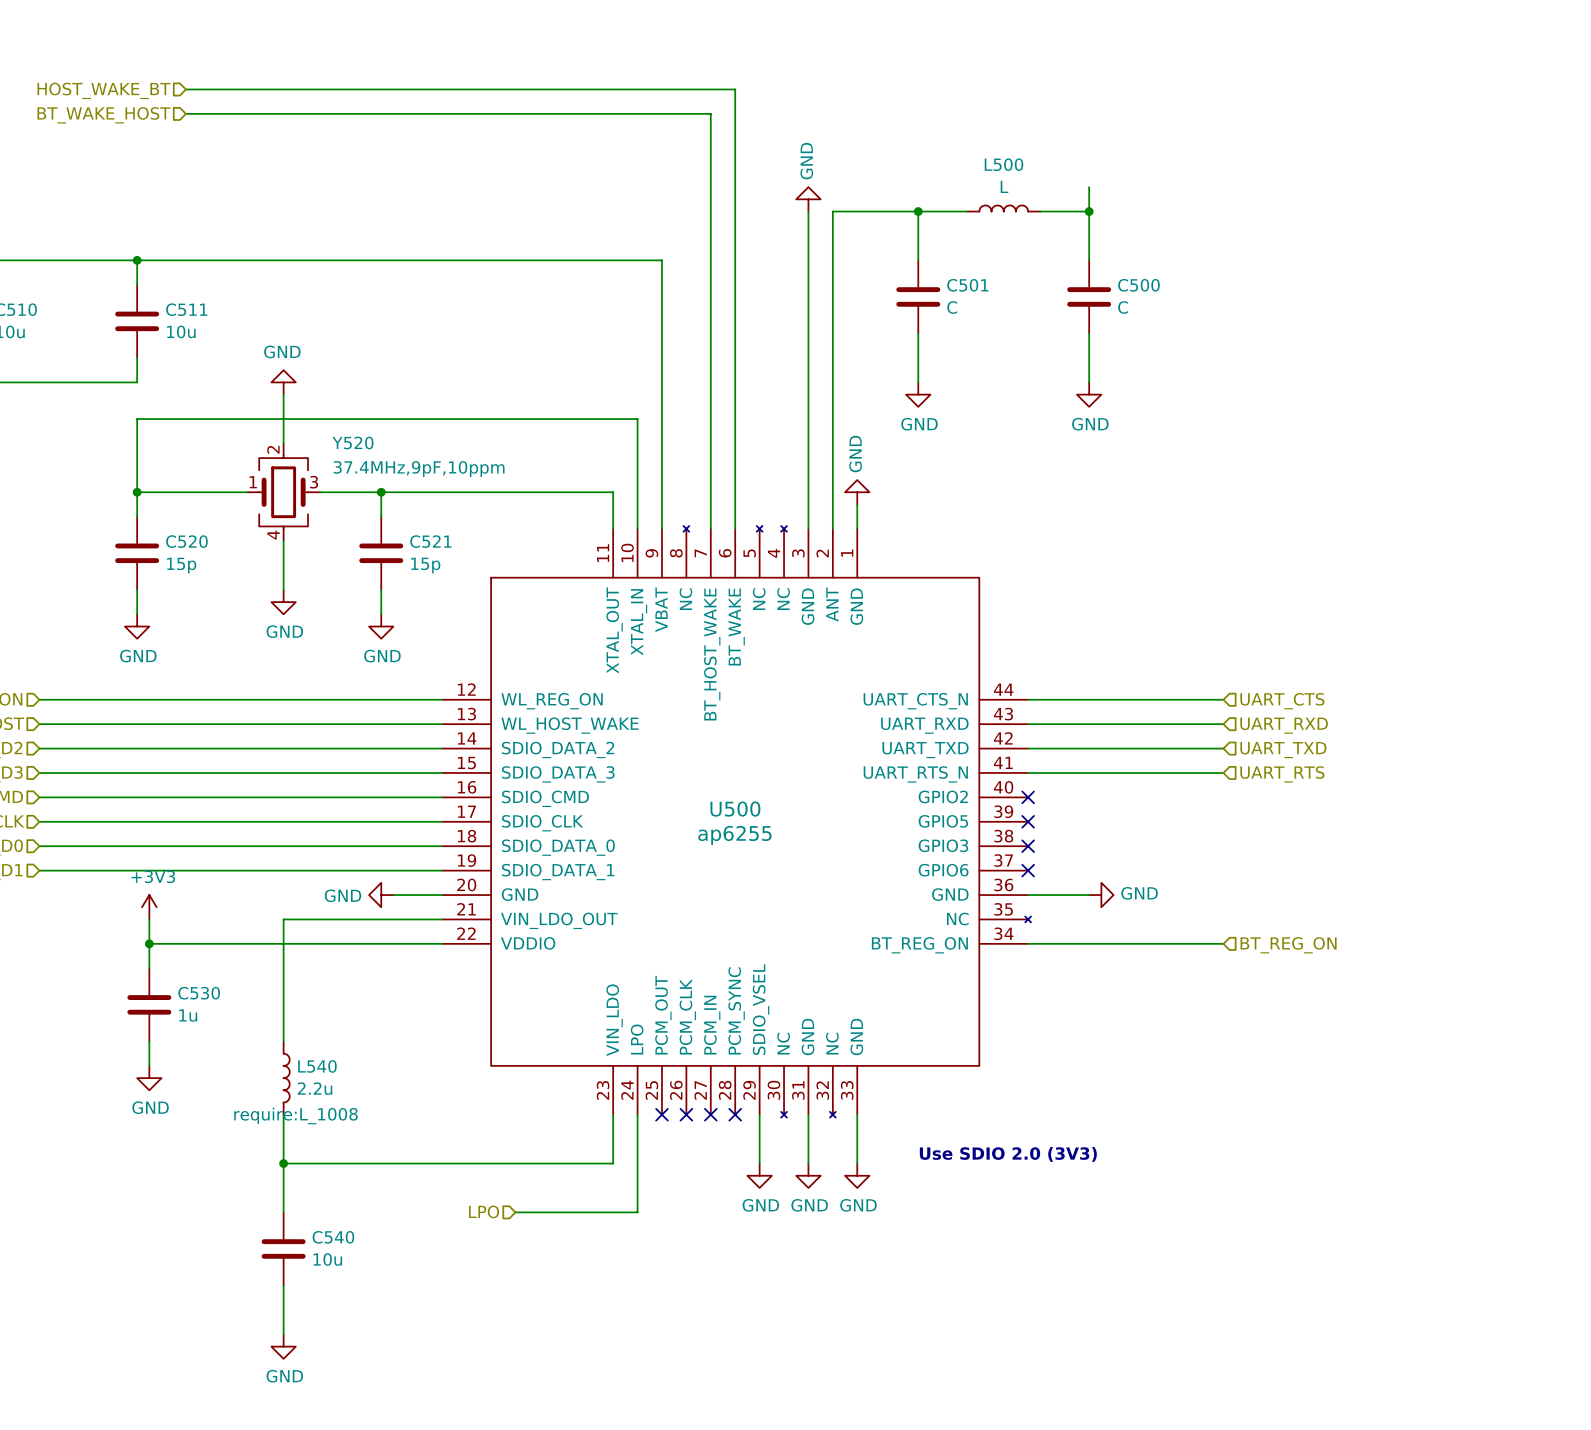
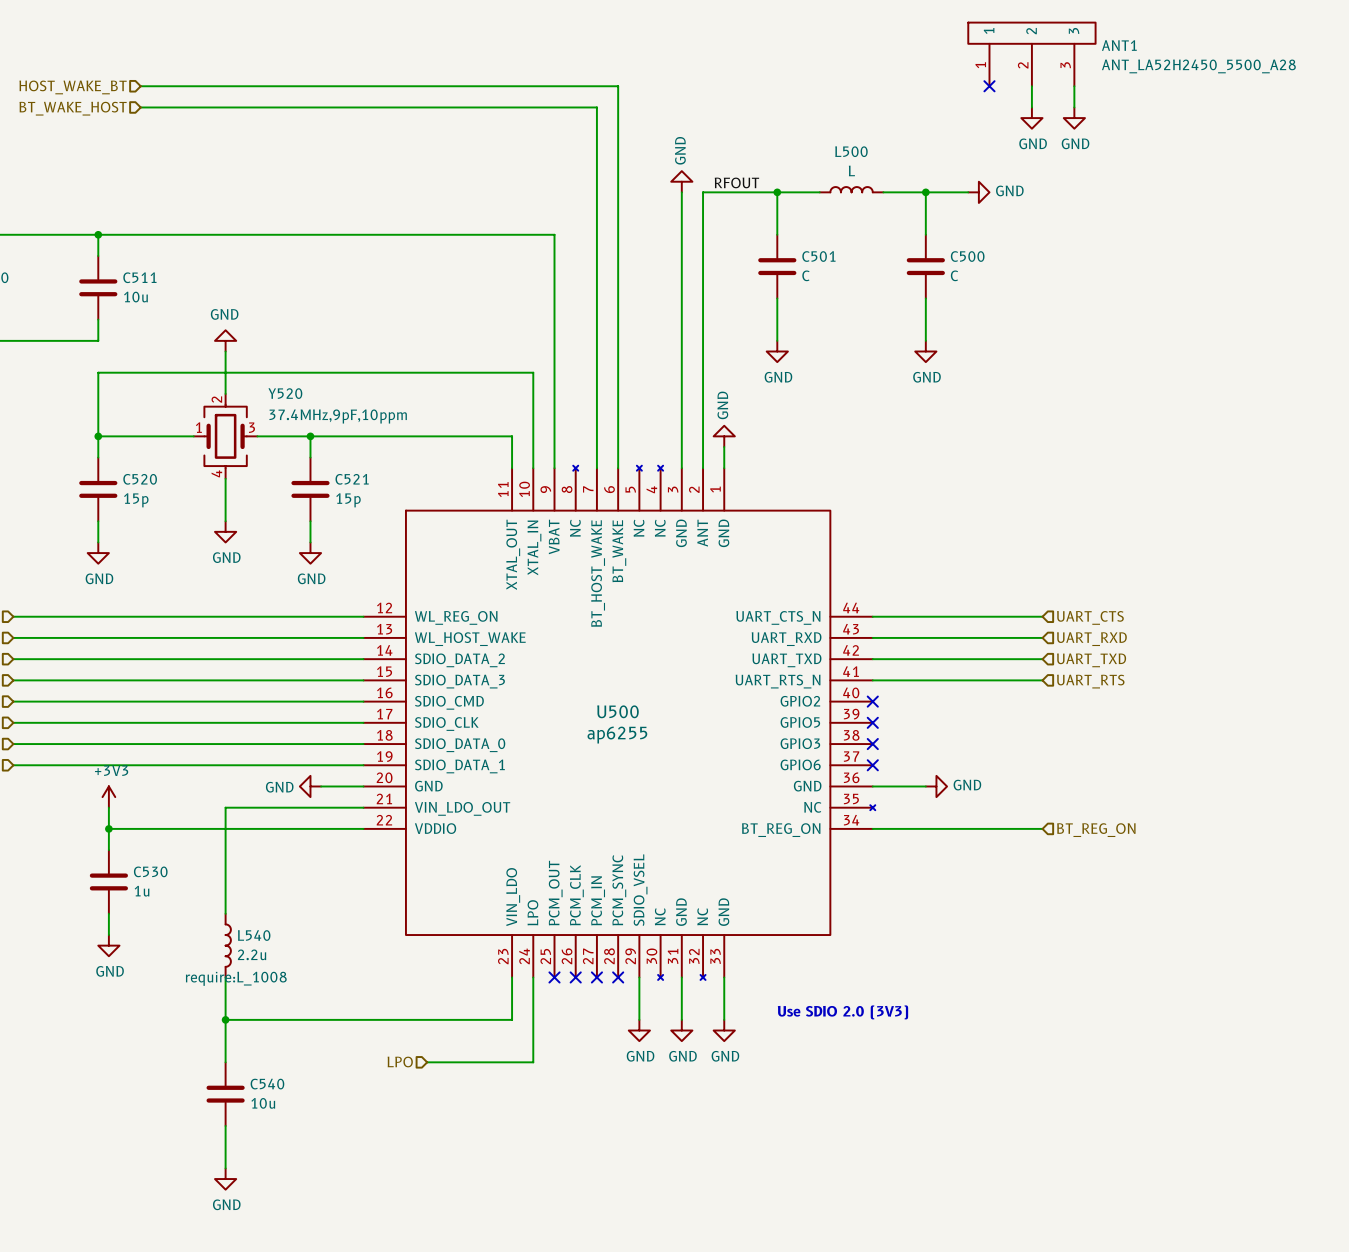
ANT1: none -> ANT_LA52H2450_5500_A28 (1031, 54)
no-connect mark: none -> (989, 86)
wire: none -> (1031, 86) (1031, 107)
wire: none -> (1074, 86) (1074, 107)
power symbol: none -> GND (1031, 118)
power symbol: none -> GND (1074, 118)
wire: (1089, 187) (1089, 211) -> (968, 192) (925, 192)
label: none -> RFOUT (736, 182)
power symbol: none -> GND (978, 192)

